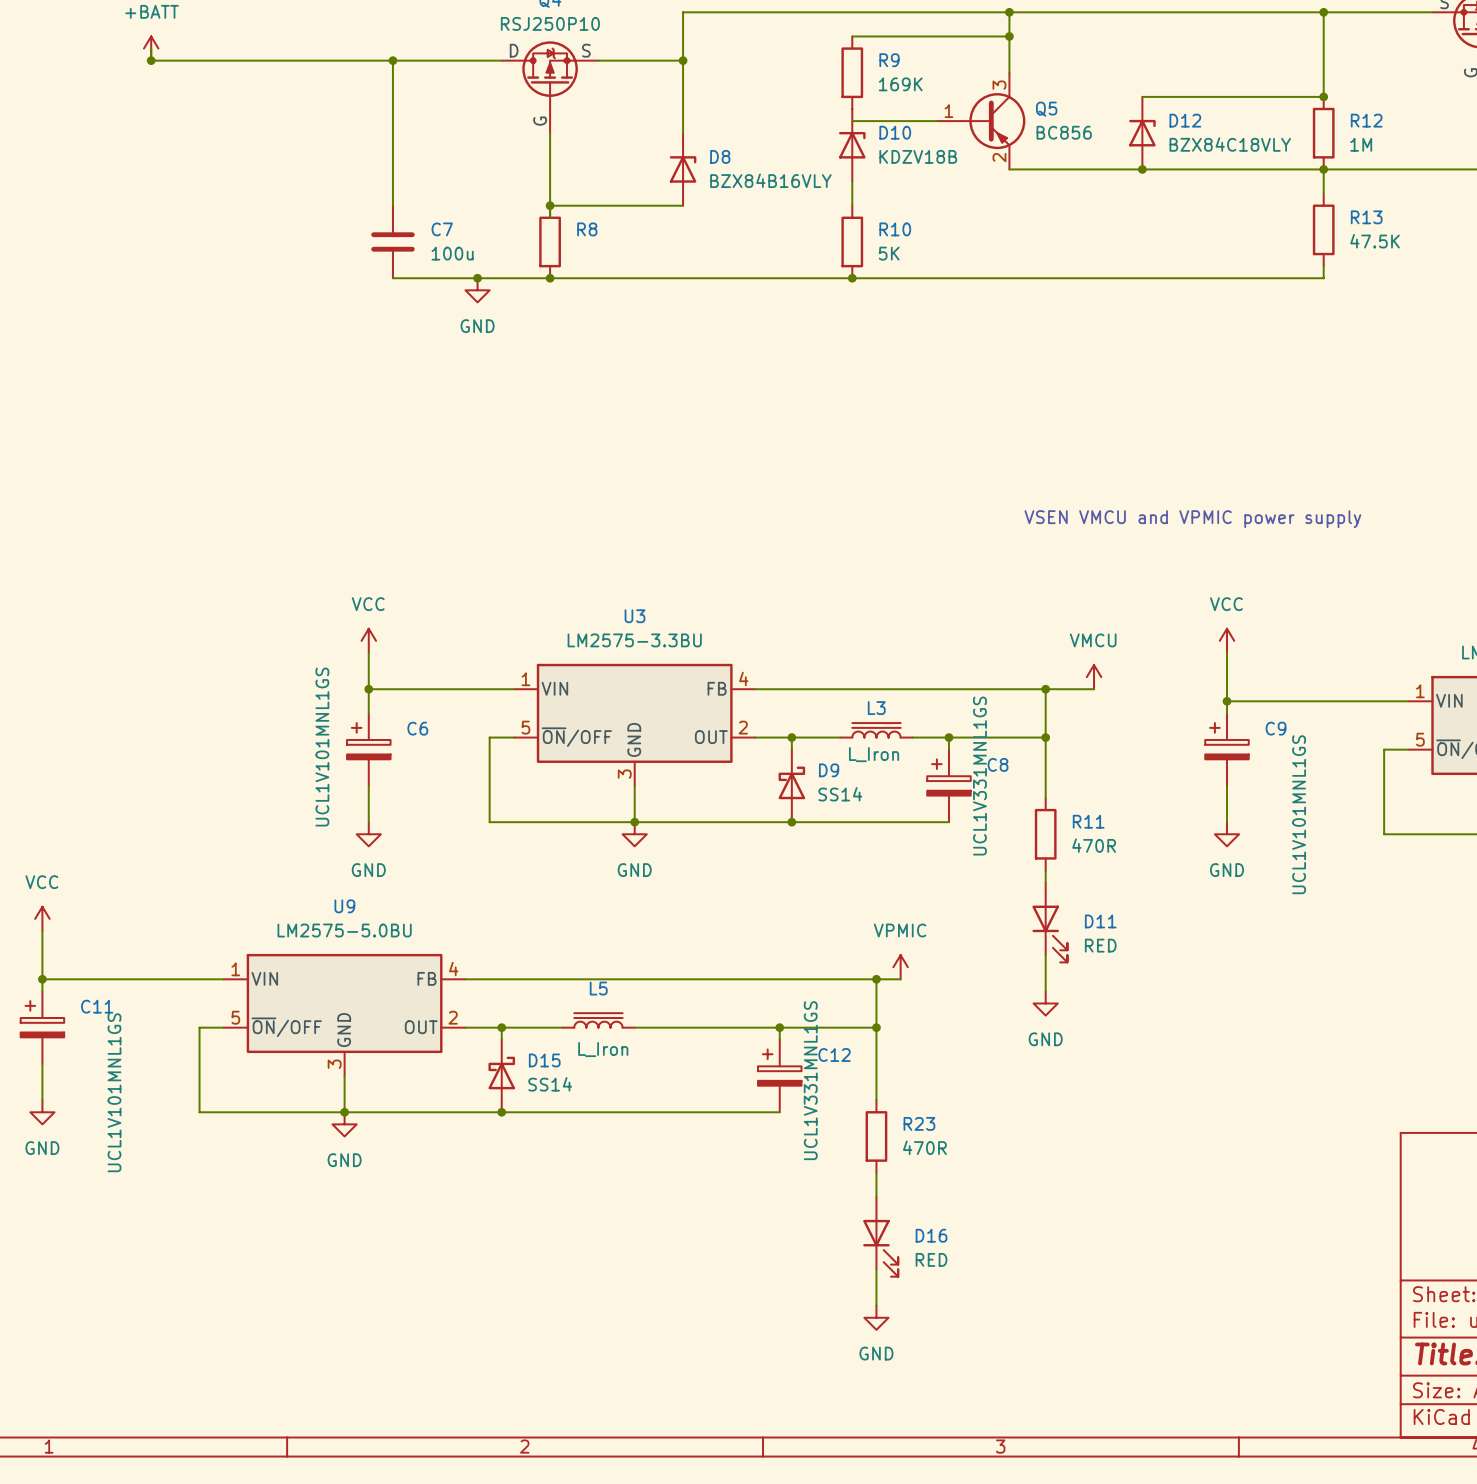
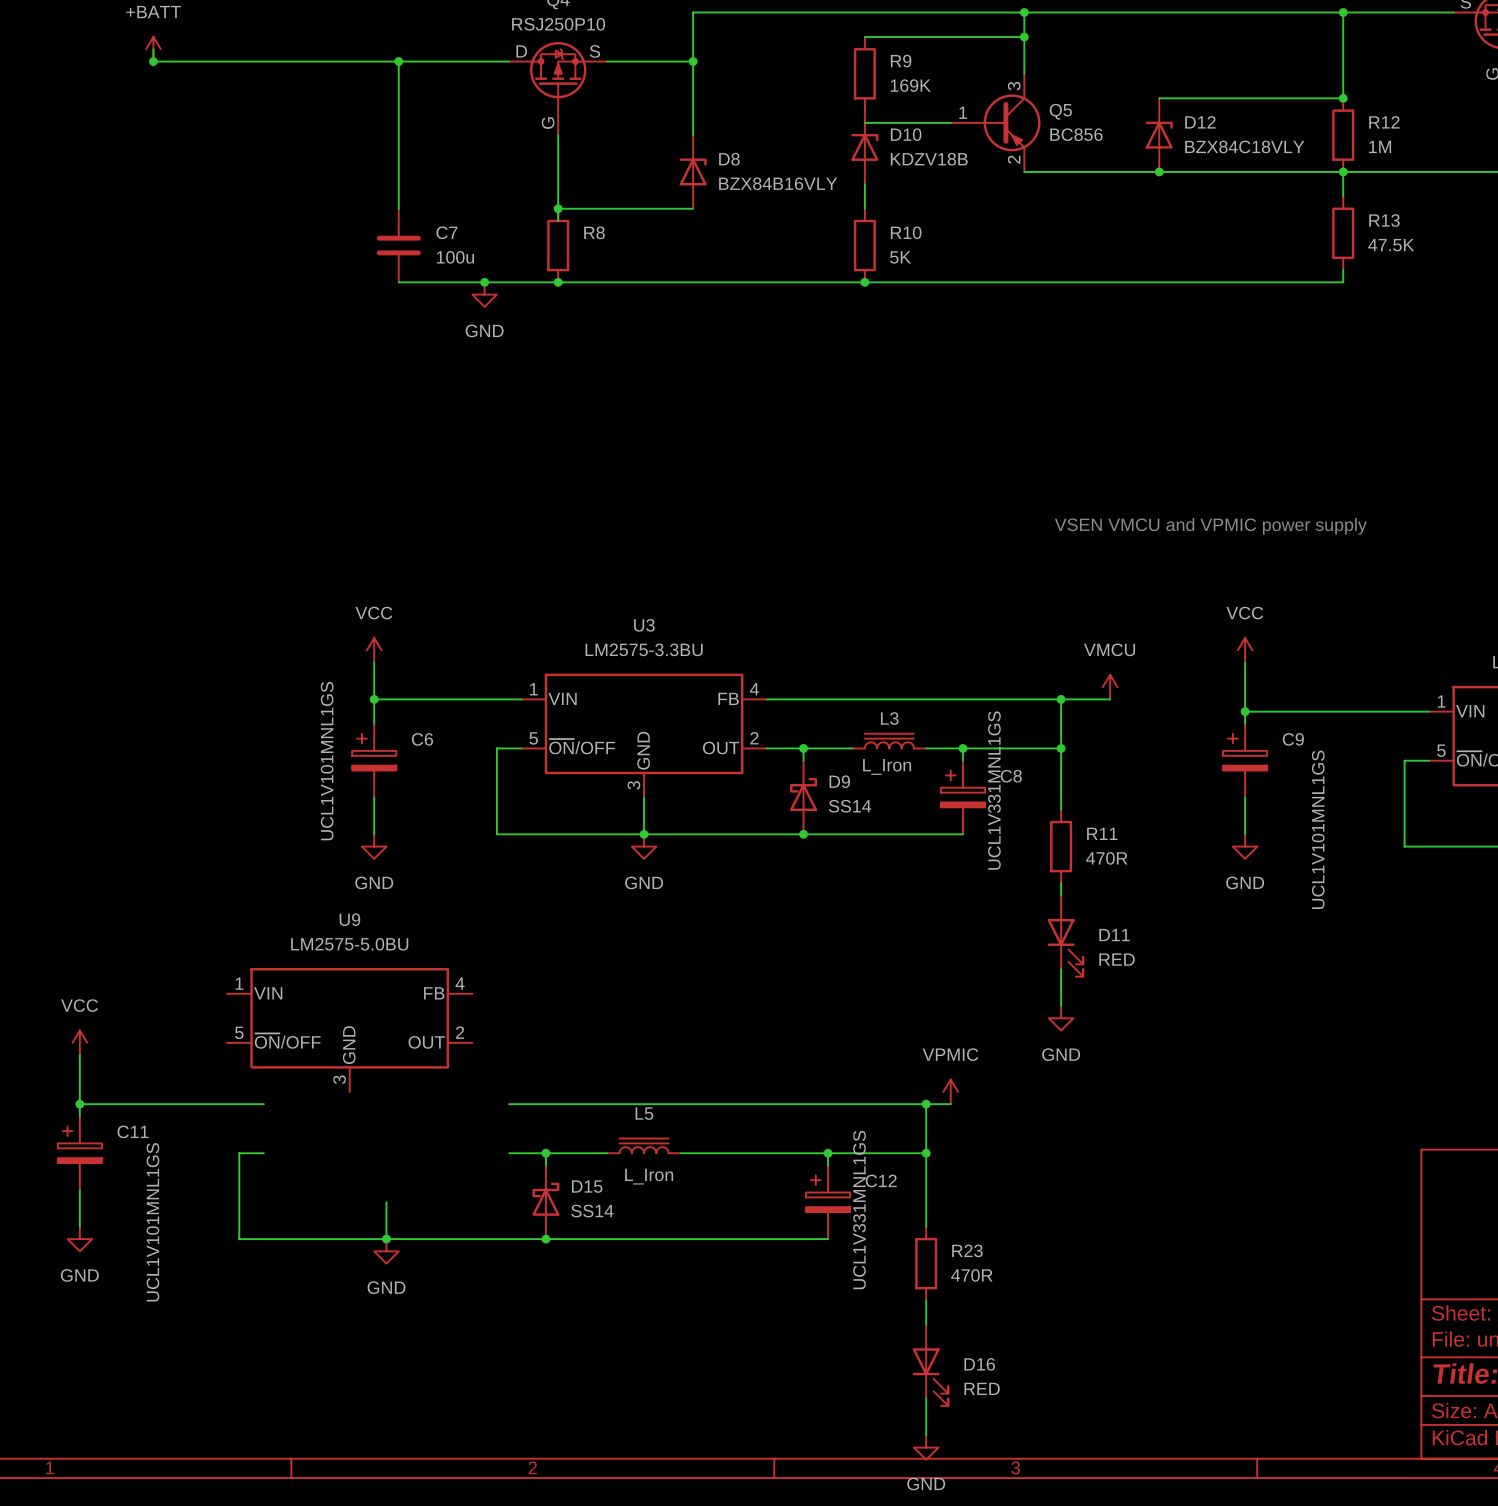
power symbol position: VCC (42, 918) -> VCC (79, 1042)
wire: (42, 930) (42, 991) -> (79, 1055) (79, 1116)
power symbol position: VPMIC (900, 967) -> VPMIC (950, 1091)
wire: (42, 979) (223, 979) -> (79, 1104) (263, 1104)
junction: (42, 979) -> none
wire: (465, 979) (900, 979) -> (509, 1104) (950, 1104)
wire: (876, 979) (876, 1100) -> (926, 1104) (926, 1226)
junction: (876, 979) -> none
L5 position: (598, 1020) -> (644, 1145)
C11 position: (42, 1027) -> (79, 1153)
wire: (223, 1027) (199, 1027) (199, 1112) (779, 1112) -> (263, 1153) (239, 1153) (239, 1239) (828, 1239)
wire: (465, 1027) (562, 1027) -> (509, 1153) (607, 1153)
wire: (501, 1027) (501, 1039) -> (545, 1153) (545, 1165)
junction: (501, 1027) -> none
wire: (634, 1027) (876, 1027) -> (680, 1153) (926, 1153)
wire: (779, 1027) (779, 1039) -> (828, 1153) (828, 1165)
junction: (779, 1027) -> none
junction: (876, 1027) -> none
wire: (42, 1063) (42, 1100) -> (79, 1190) (79, 1226)
wire: (344, 1076) (344, 1112) -> (386, 1202) (386, 1239)
D15 position: (501, 1076) -> (545, 1202)
C12 position: (779, 1076) -> (828, 1202)
junction: none -> (79, 1104)
junction: none -> (926, 1104)
power symbol position: GND (42, 1112) -> GND (79, 1239)
junction: (344, 1112) -> none
junction position: (501, 1112) -> (545, 1153)
power symbol position: GND (344, 1124) -> GND (386, 1251)
junction: none -> (828, 1153)
R23 position: (876, 1136) -> (926, 1263)
junction: none -> (926, 1153)
wire: (876, 1172) (876, 1196) -> (926, 1300) (926, 1324)
junction: none -> (386, 1239)
junction: none -> (545, 1239)
D16 position: (880, 1236) -> (930, 1365)
wire: (876, 1269) (876, 1305) -> (926, 1398) (926, 1435)
power symbol position: GND (876, 1317) -> GND (926, 1447)

